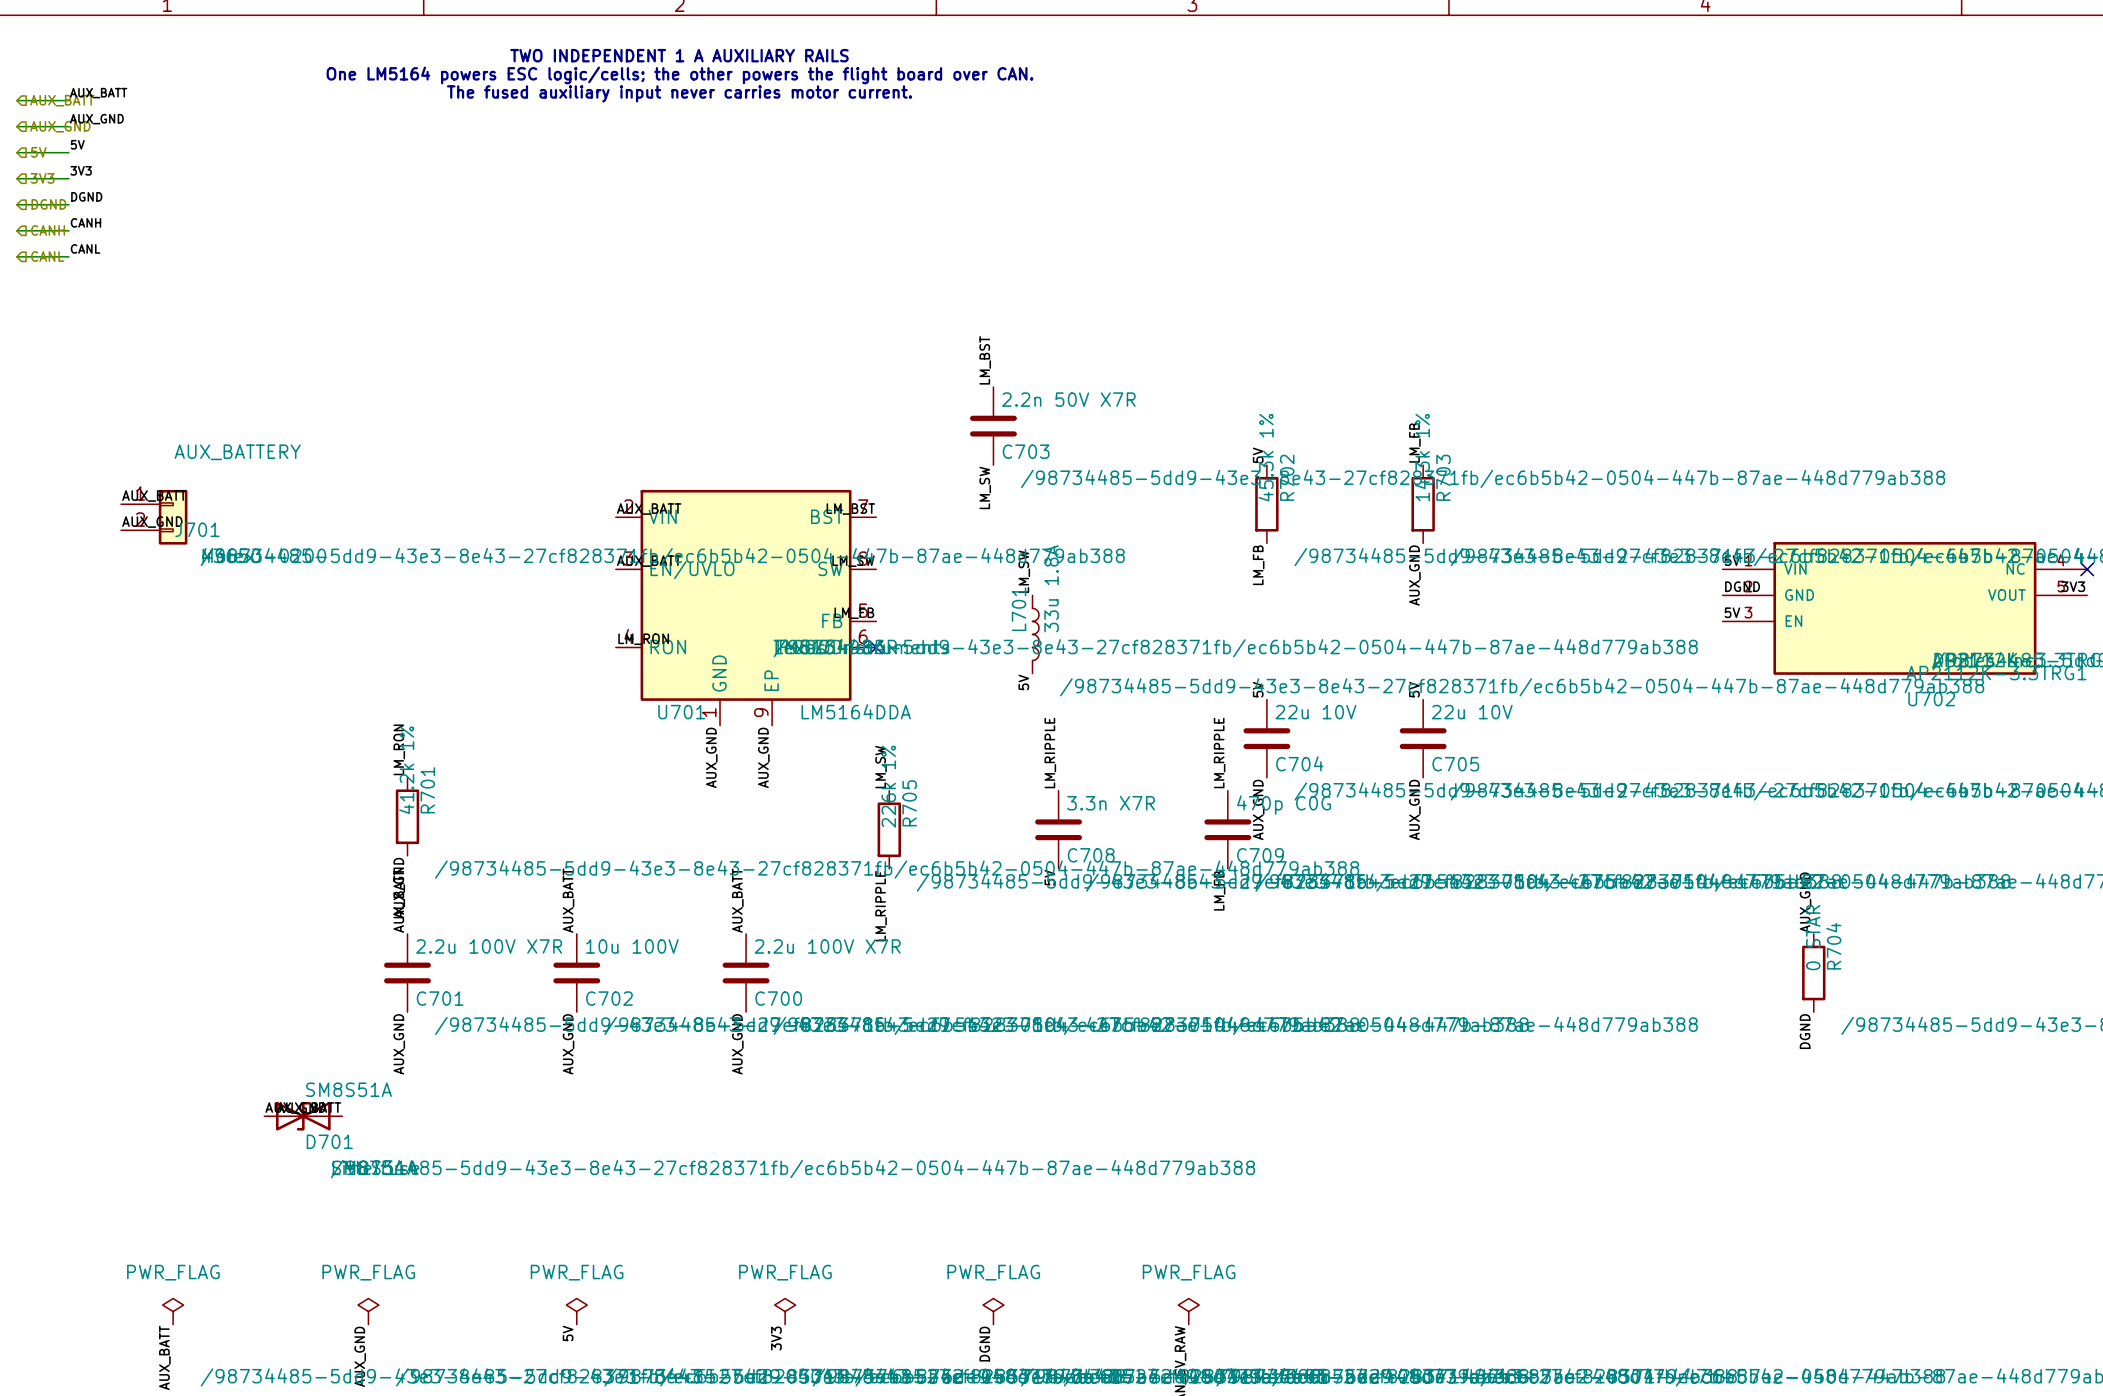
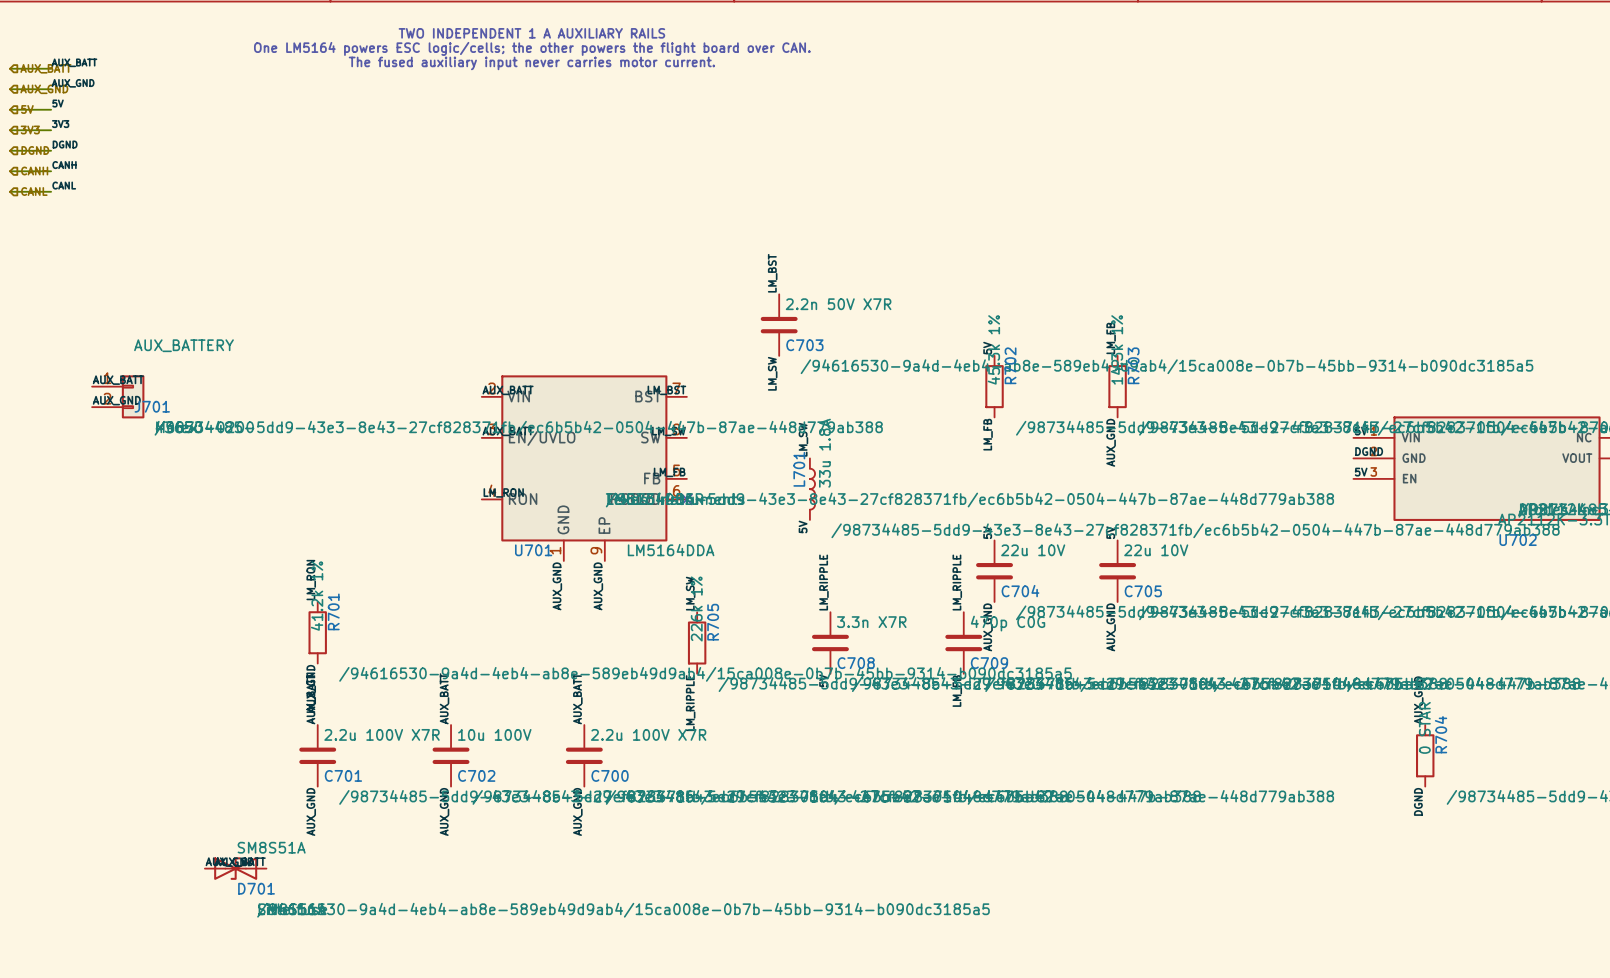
C703 text: /98734485-5dd9-43e3-8e43-27cf828371fb/ec6b5b42-0504-447b-87ae-448d779ab388 (1483, 478) -> /94616530-9a4d-4eb4-ab8e-589eb49d9ab4/15ca008e-0b7b-45bb-9314-b090dc3185a5 (1166, 366)
R701 text: /98734485-5dd9-43e3-8e43-27cf828371fb/ec6b5b42-0504-447b-87ae-448d779ab388 (897, 869) -> /94616530-9a4d-4eb4-ab8e-589eb49d9ab4/15ca008e-0b7b-45bb-9314-b090dc3185a5 (705, 674)
D701 text: /98734485-5dd9-43e3-8e43-27cf828371fb/ec6b5b42-0504-447b-87ae-448d779ab388 (792, 1169) -> /94616530-9a4d-4eb4-ab8e-589eb49d9ab4/15ca008e-0b7b-45bb-9314-b090dc3185a5 (623, 910)

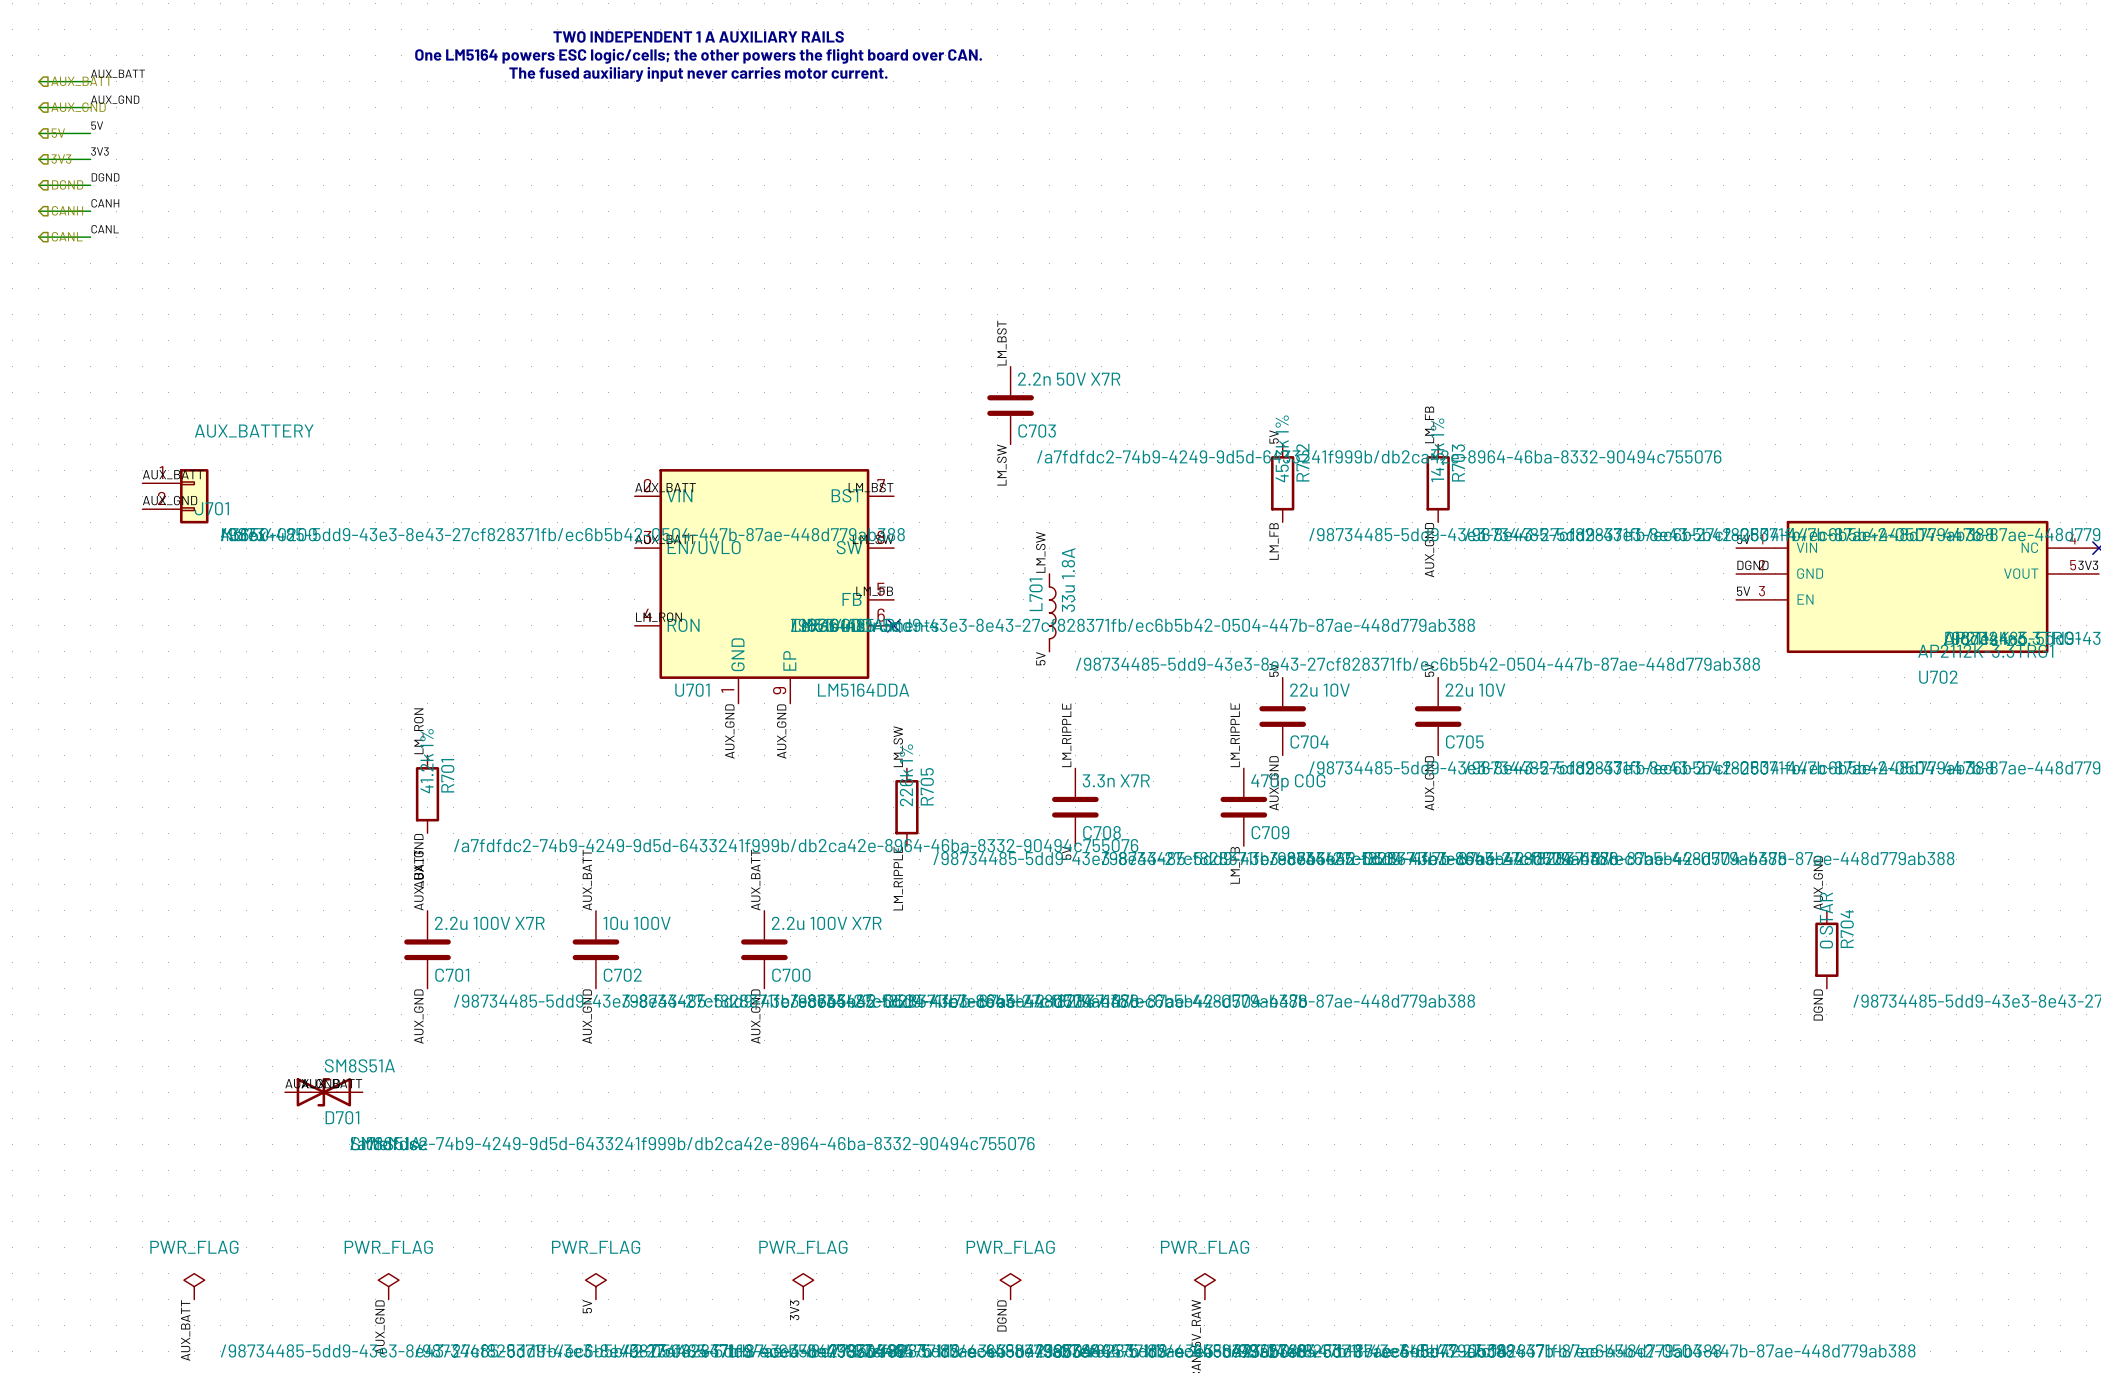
C703 text: /94616530-9a4d-4eb4-ab8e-589eb49d9ab4/15ca008e-0b7b-45bb-9314-b090dc3185a5 (1166, 366) -> /a7fdfdc2-74b9-4249-9d5d-6433241f999b/db2ca42e-8964-46ba-8332-90494c755076 (1379, 456)
R701 text: /94616530-9a4d-4eb4-ab8e-589eb49d9ab4/15ca008e-0b7b-45bb-9314-b090dc3185a5 (705, 674) -> /a7fdfdc2-74b9-4249-9d5d-6433241f999b/db2ca42e-8964-46ba-8332-90494c755076 (796, 845)
D701 text: /94616530-9a4d-4eb4-ab8e-589eb49d9ab4/15ca008e-0b7b-45bb-9314-b090dc3185a5 (623, 910) -> /a7fdfdc2-74b9-4249-9d5d-6433241f999b/db2ca42e-8964-46ba-8332-90494c755076 (692, 1143)

